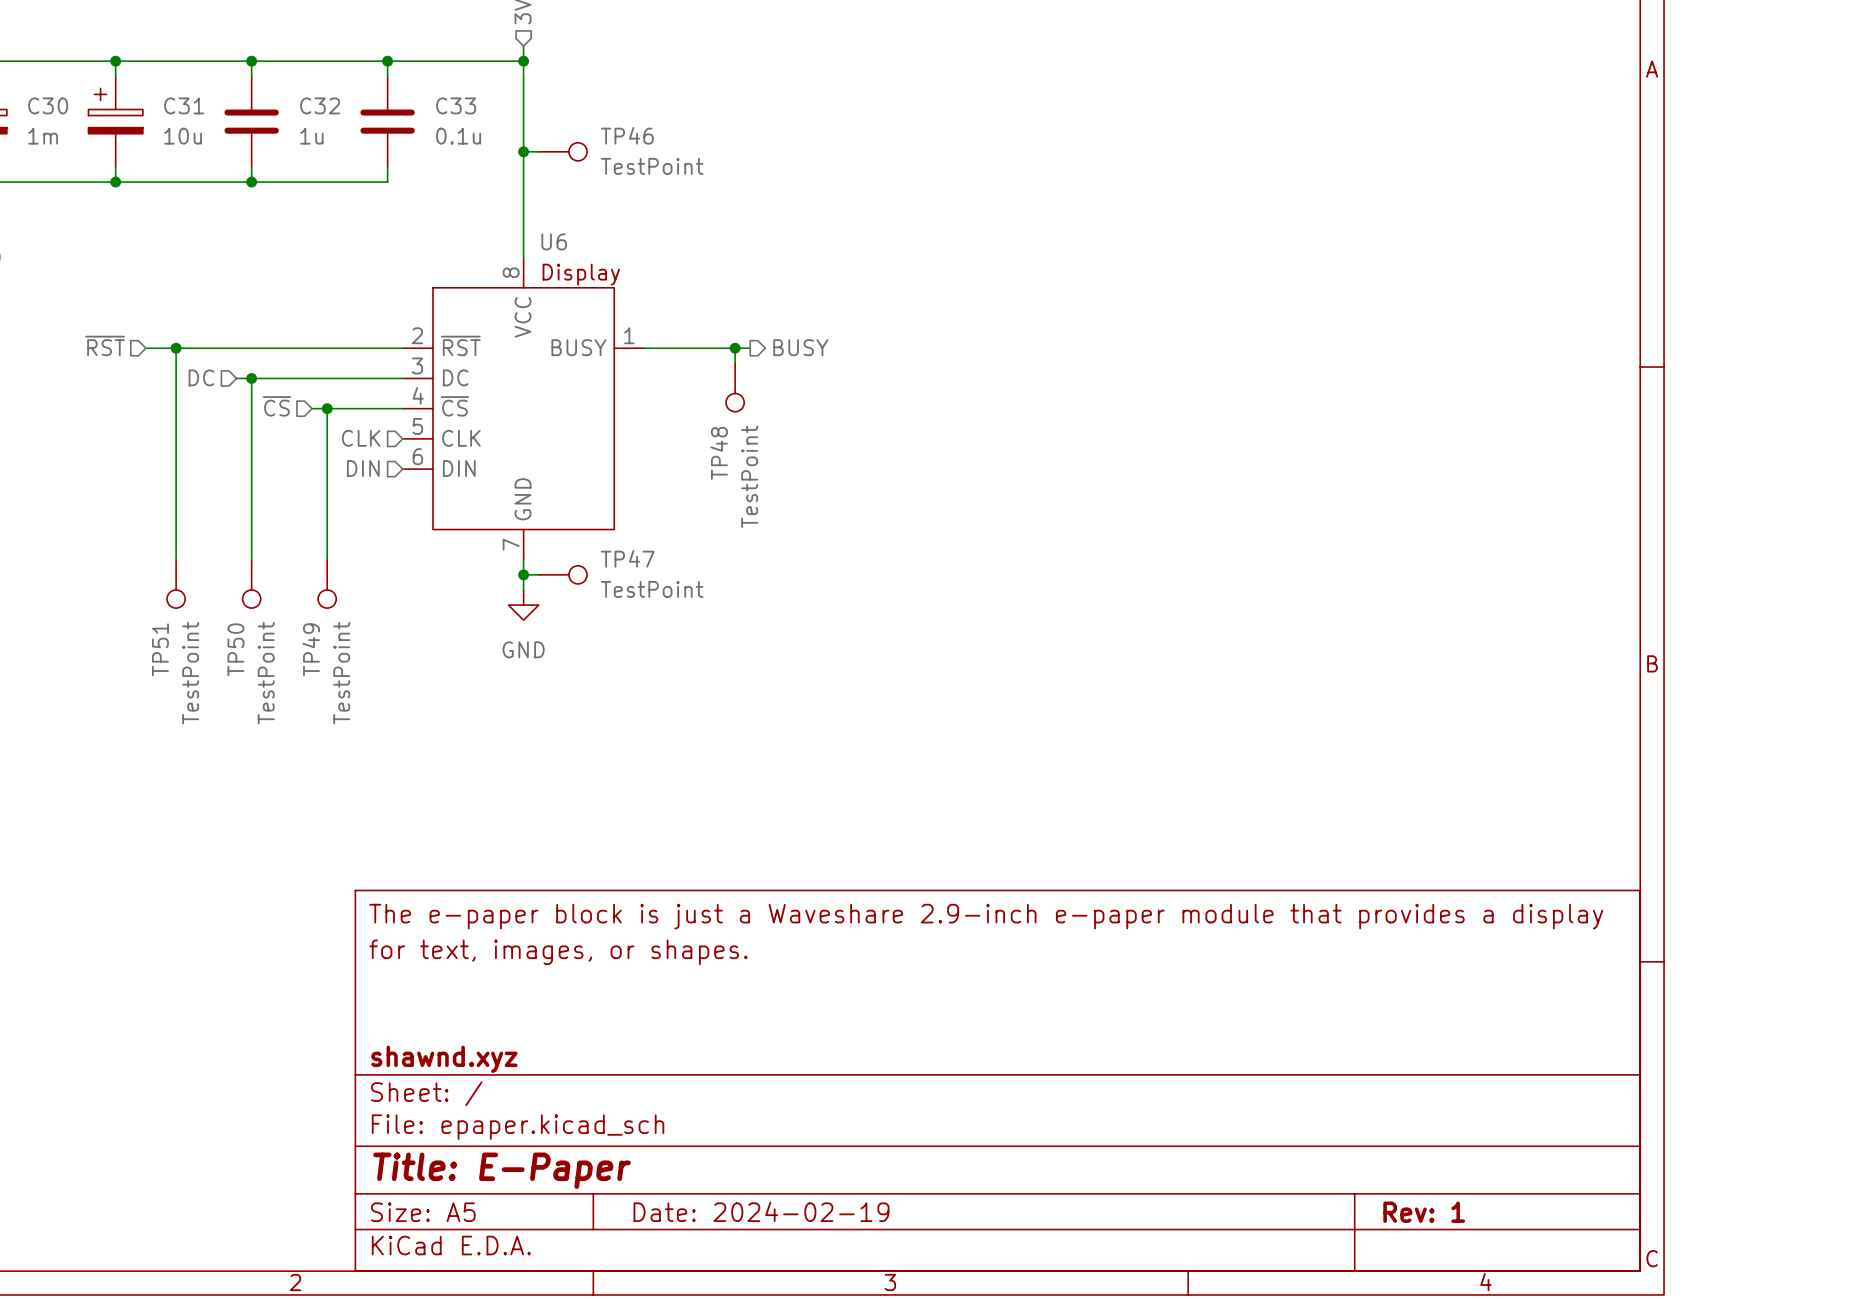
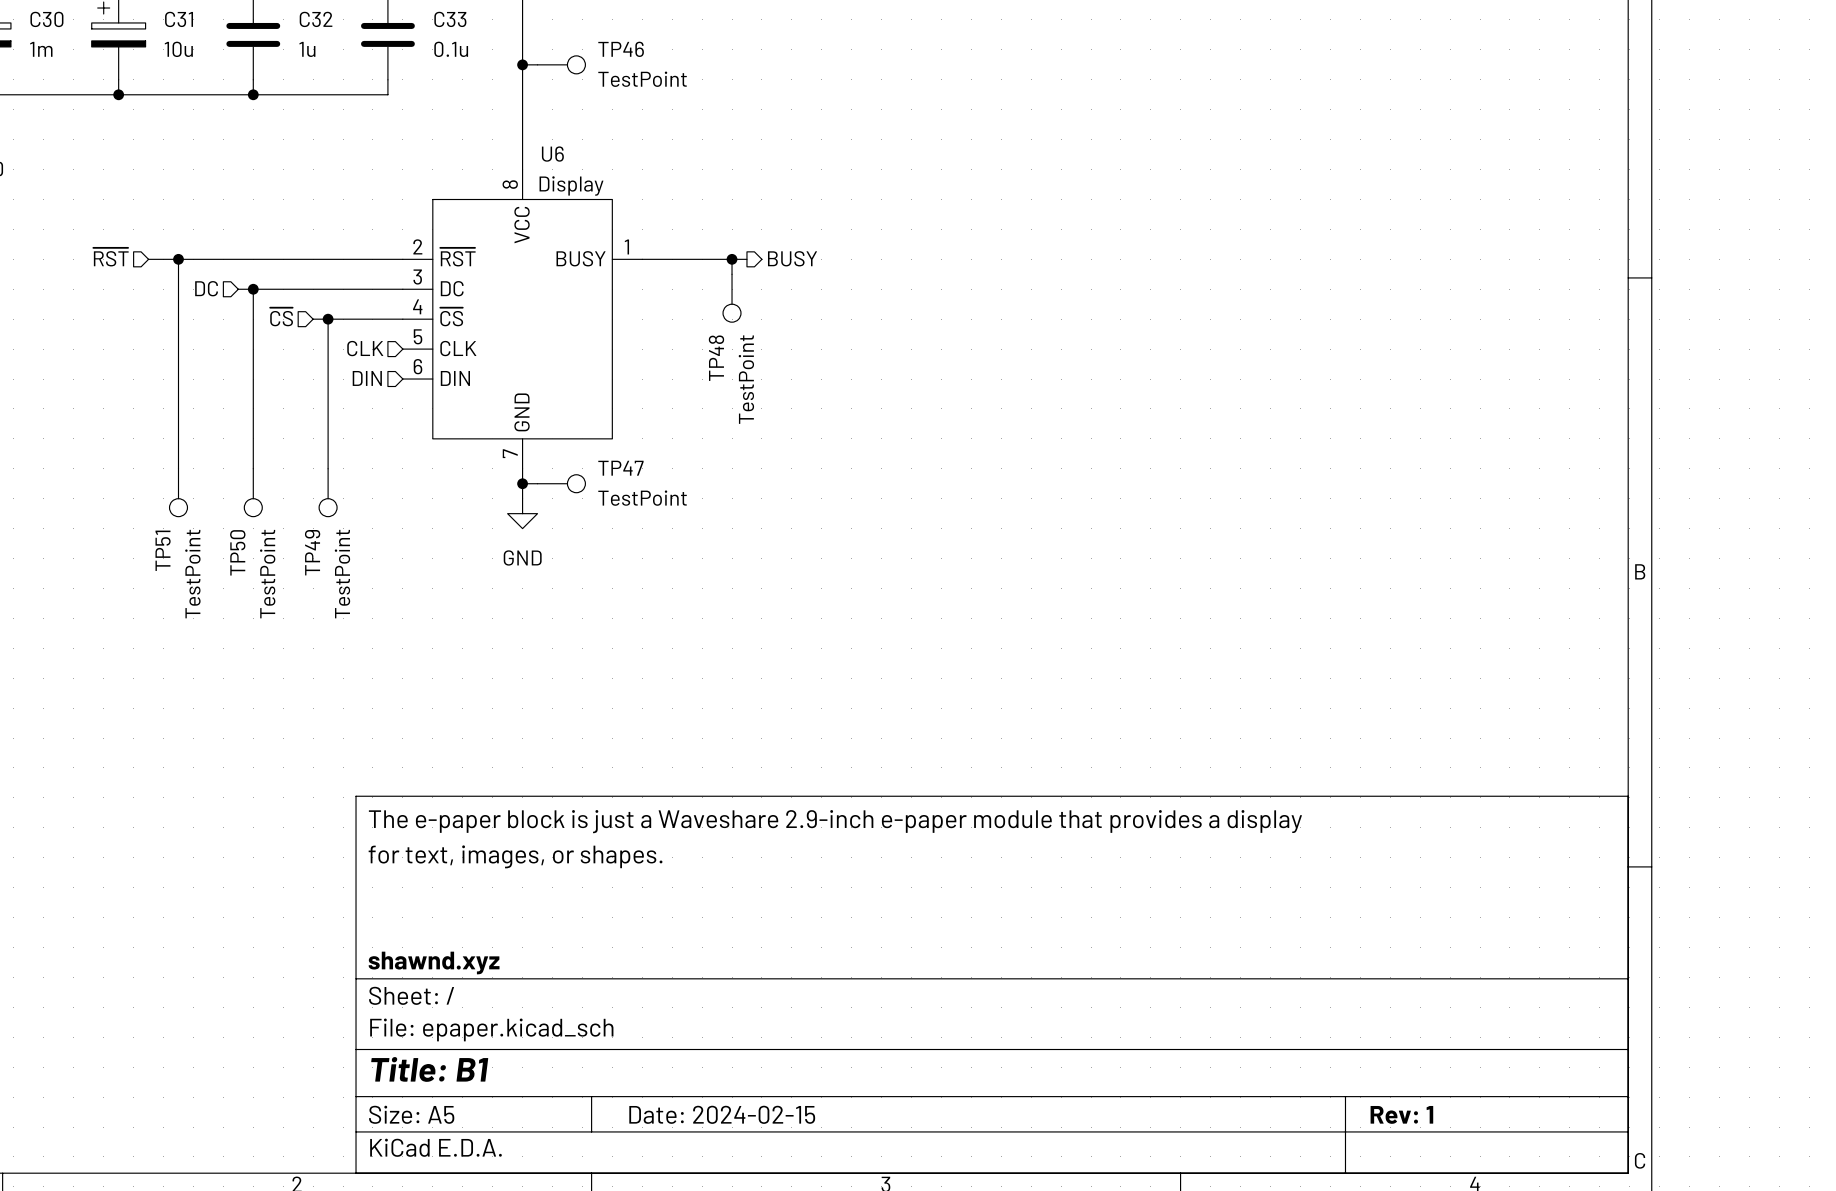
title block: Title: E-Paper (502, 1170) -> Title: B1 (429, 1069)
title block: Date: 2024-02-19 (761, 1211) -> Date: 2024-02-15 (722, 1114)

